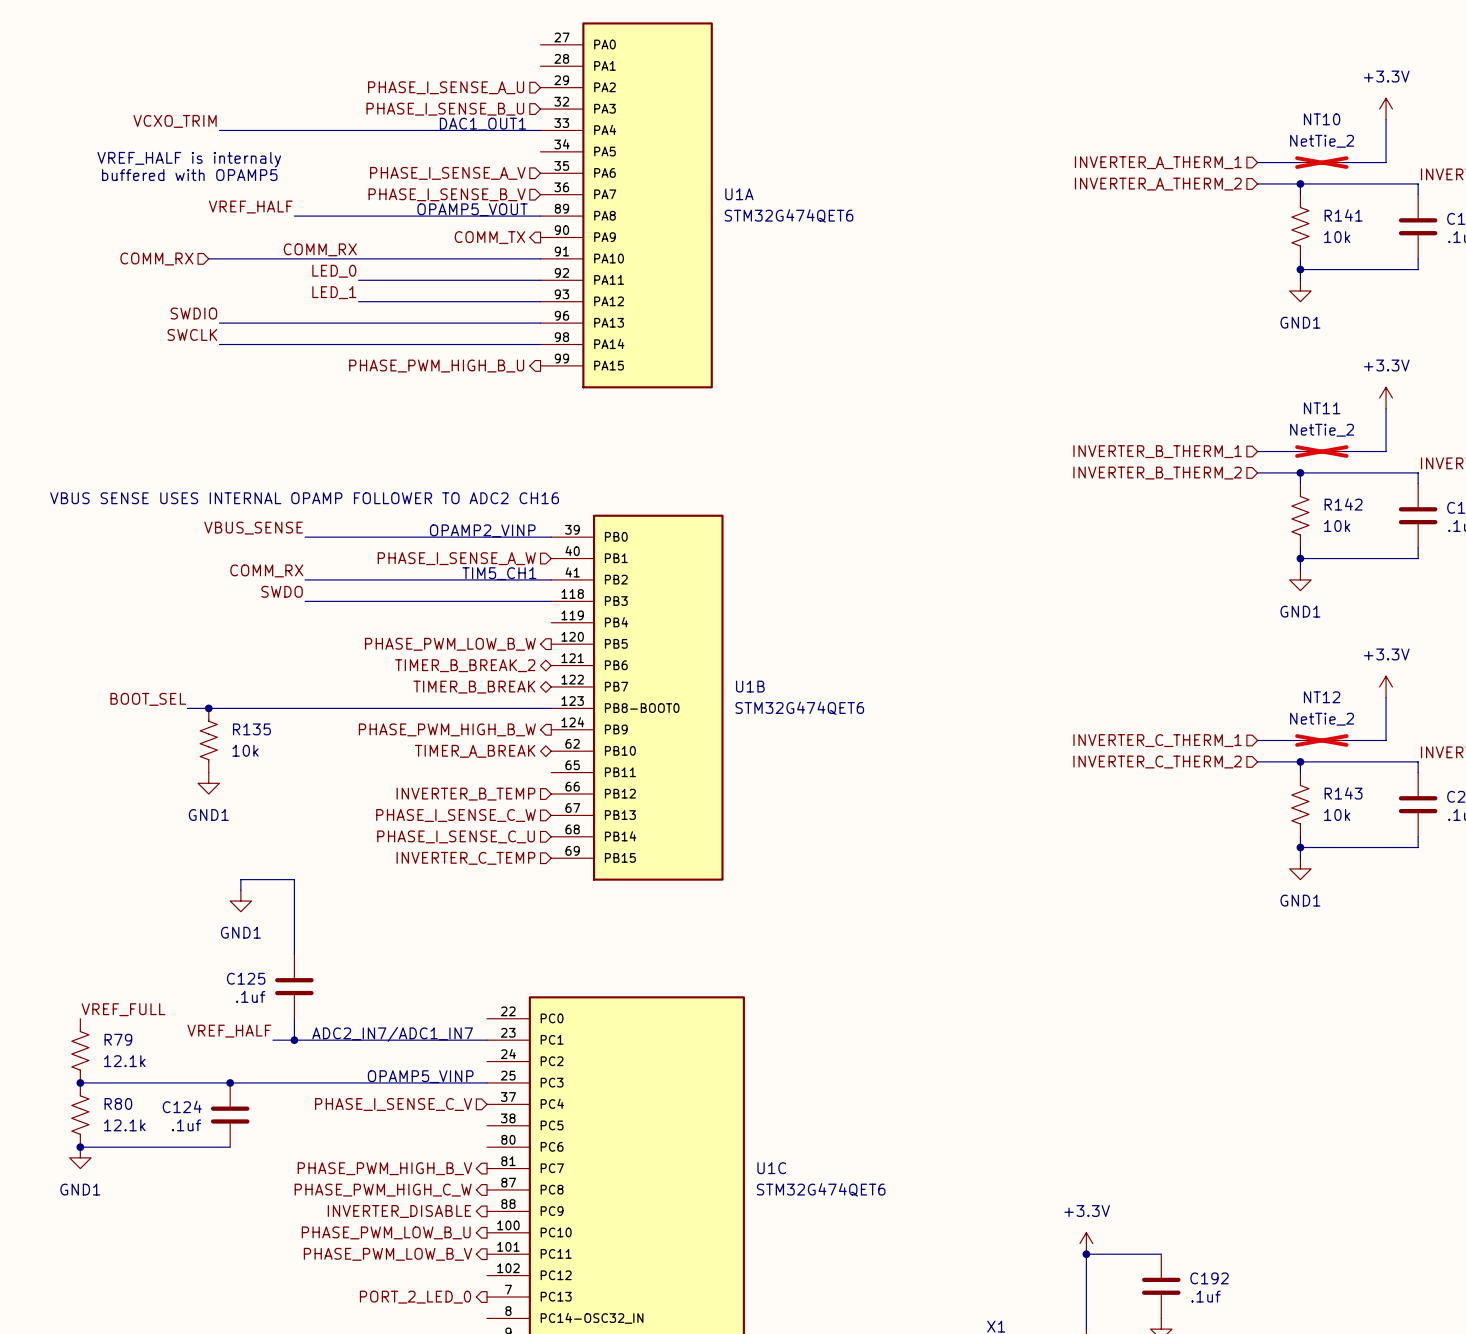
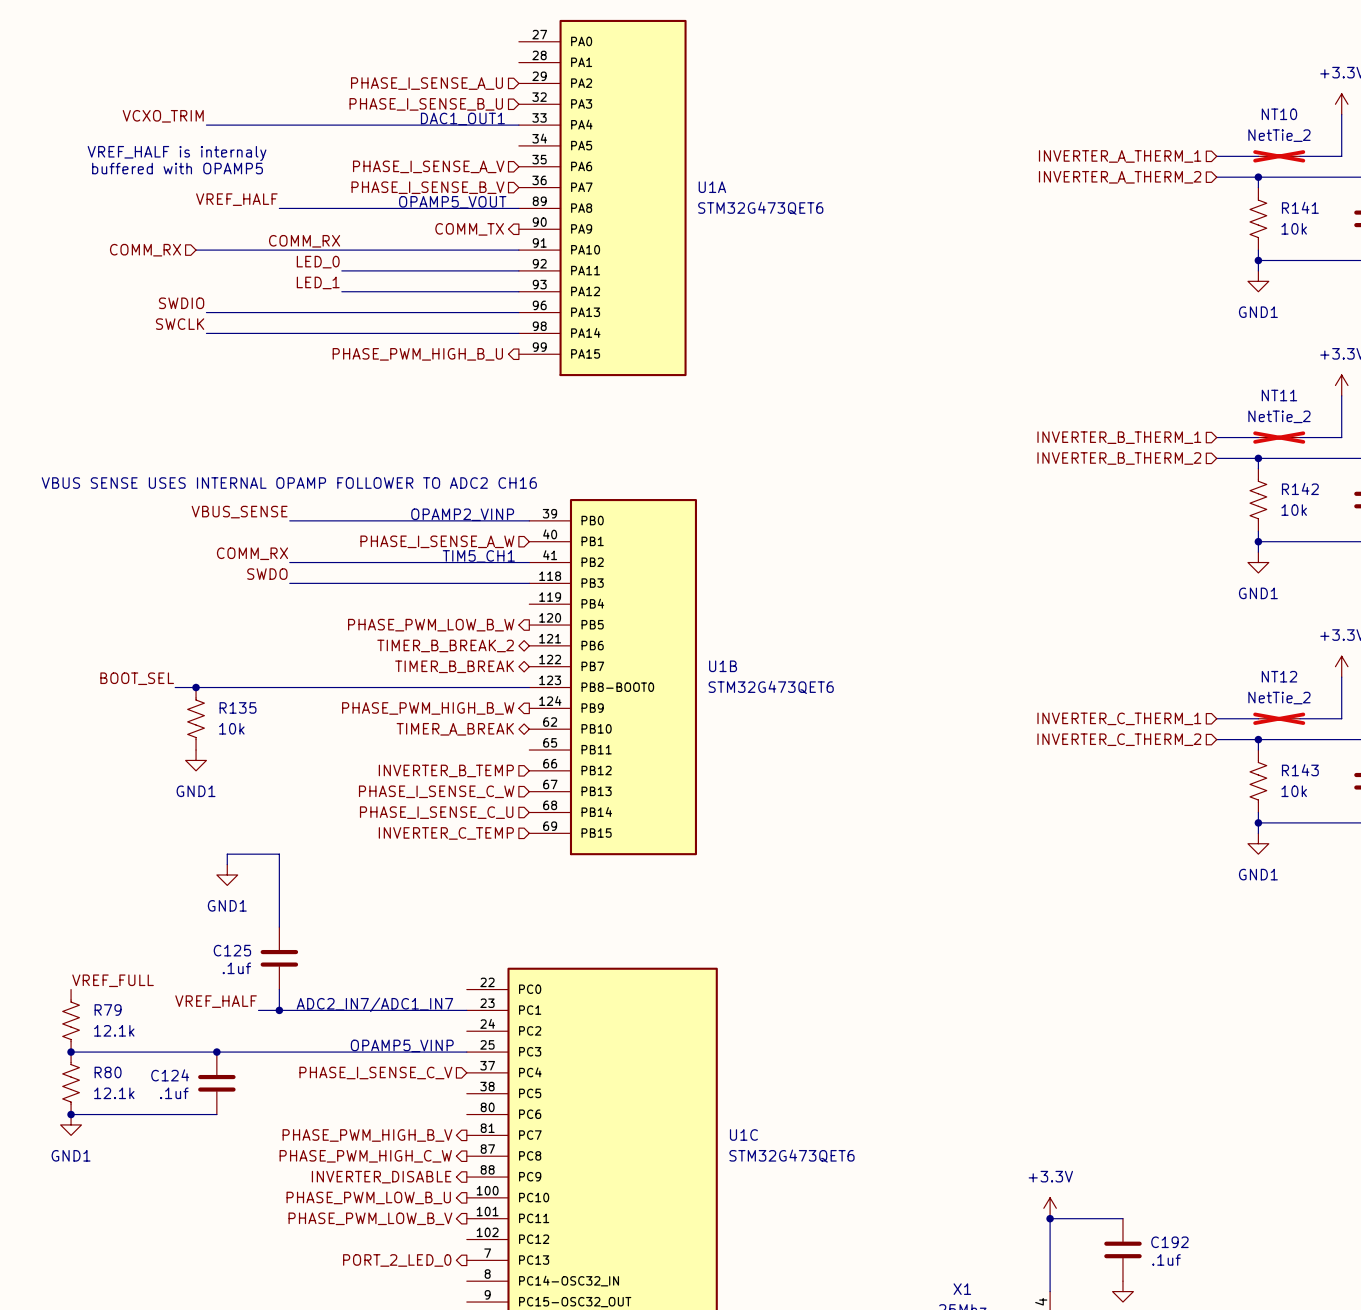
U1A value: STM32G474QET6 (789, 215) -> STM32G473QET6 (760, 208)
U1B value: STM32G474QET6 (799, 708) -> STM32G473QET6 (771, 687)
U1C value: STM32G474QET6 (821, 1189) -> STM32G473QET6 (792, 1156)

